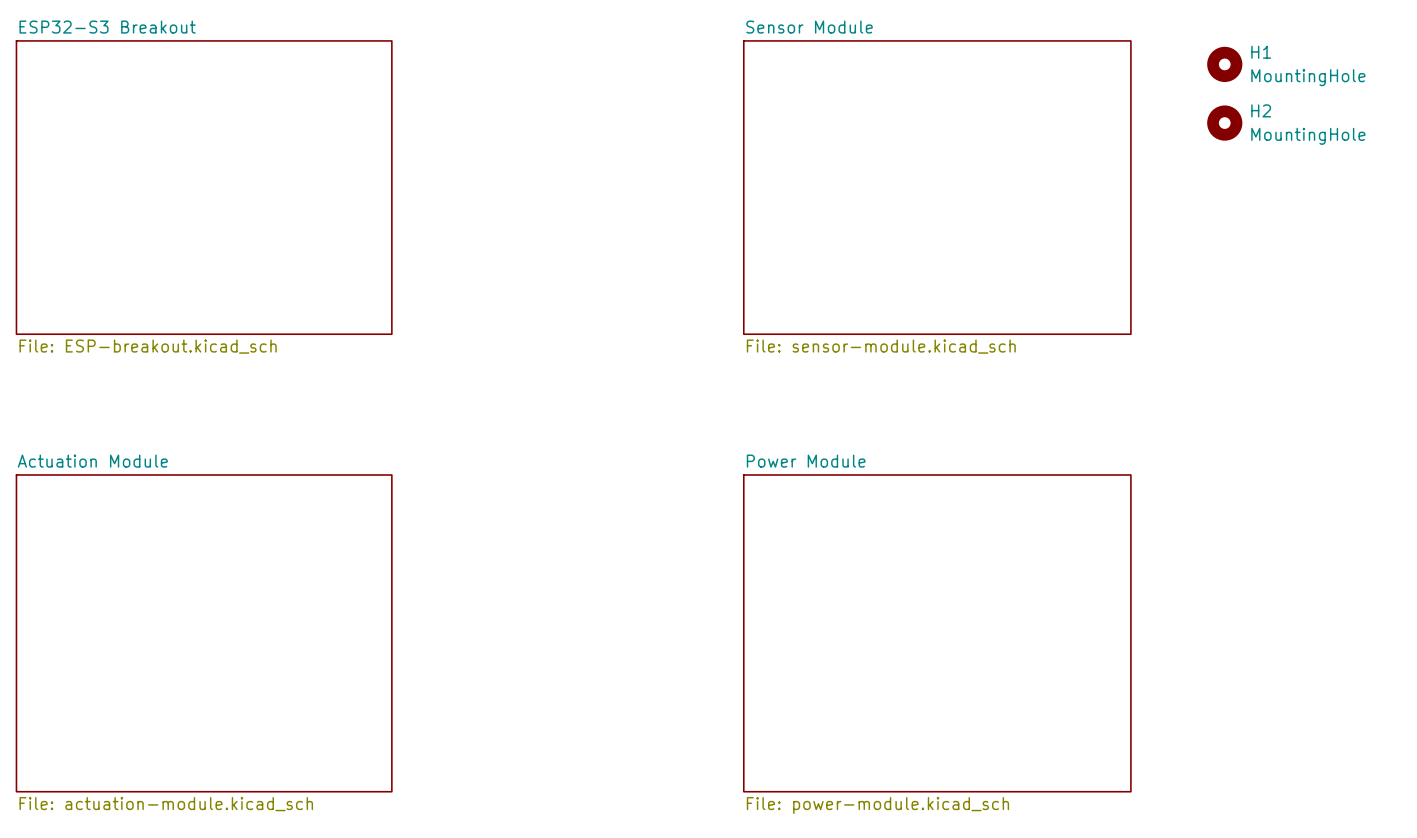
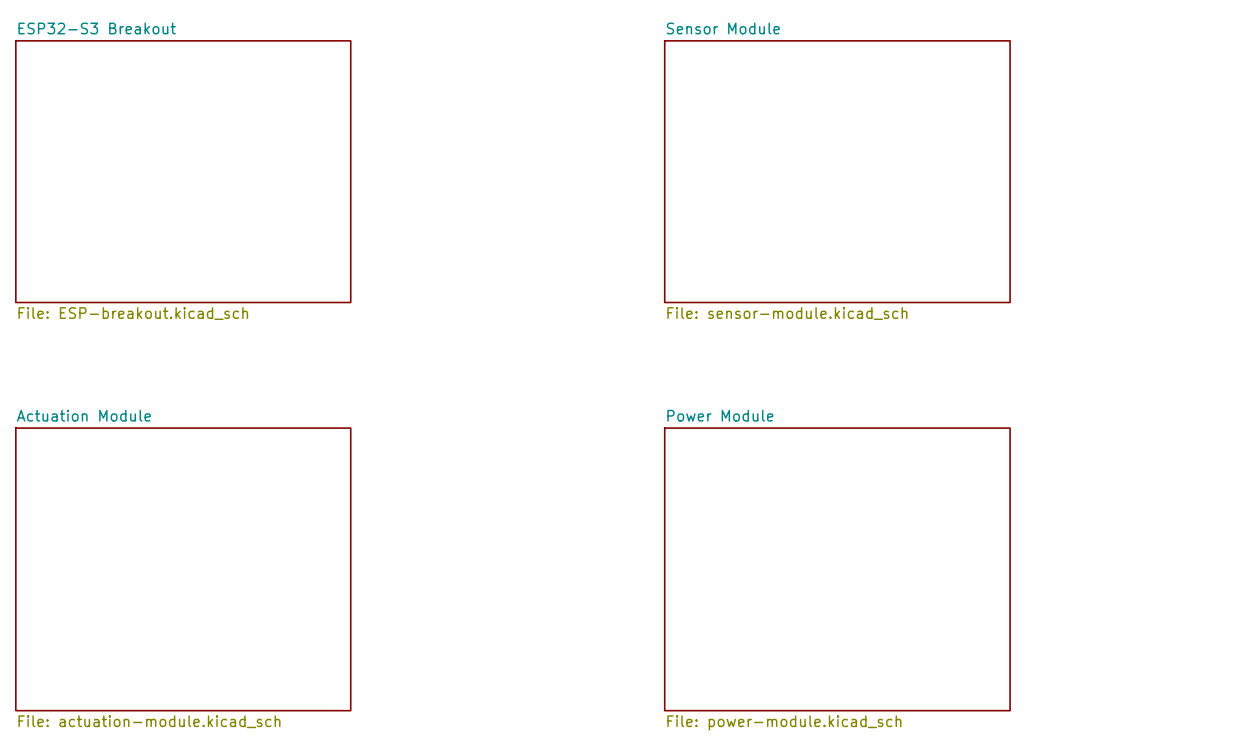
H1: MountingHole (1224, 64) -> none
H2: MountingHole (1224, 123) -> none

